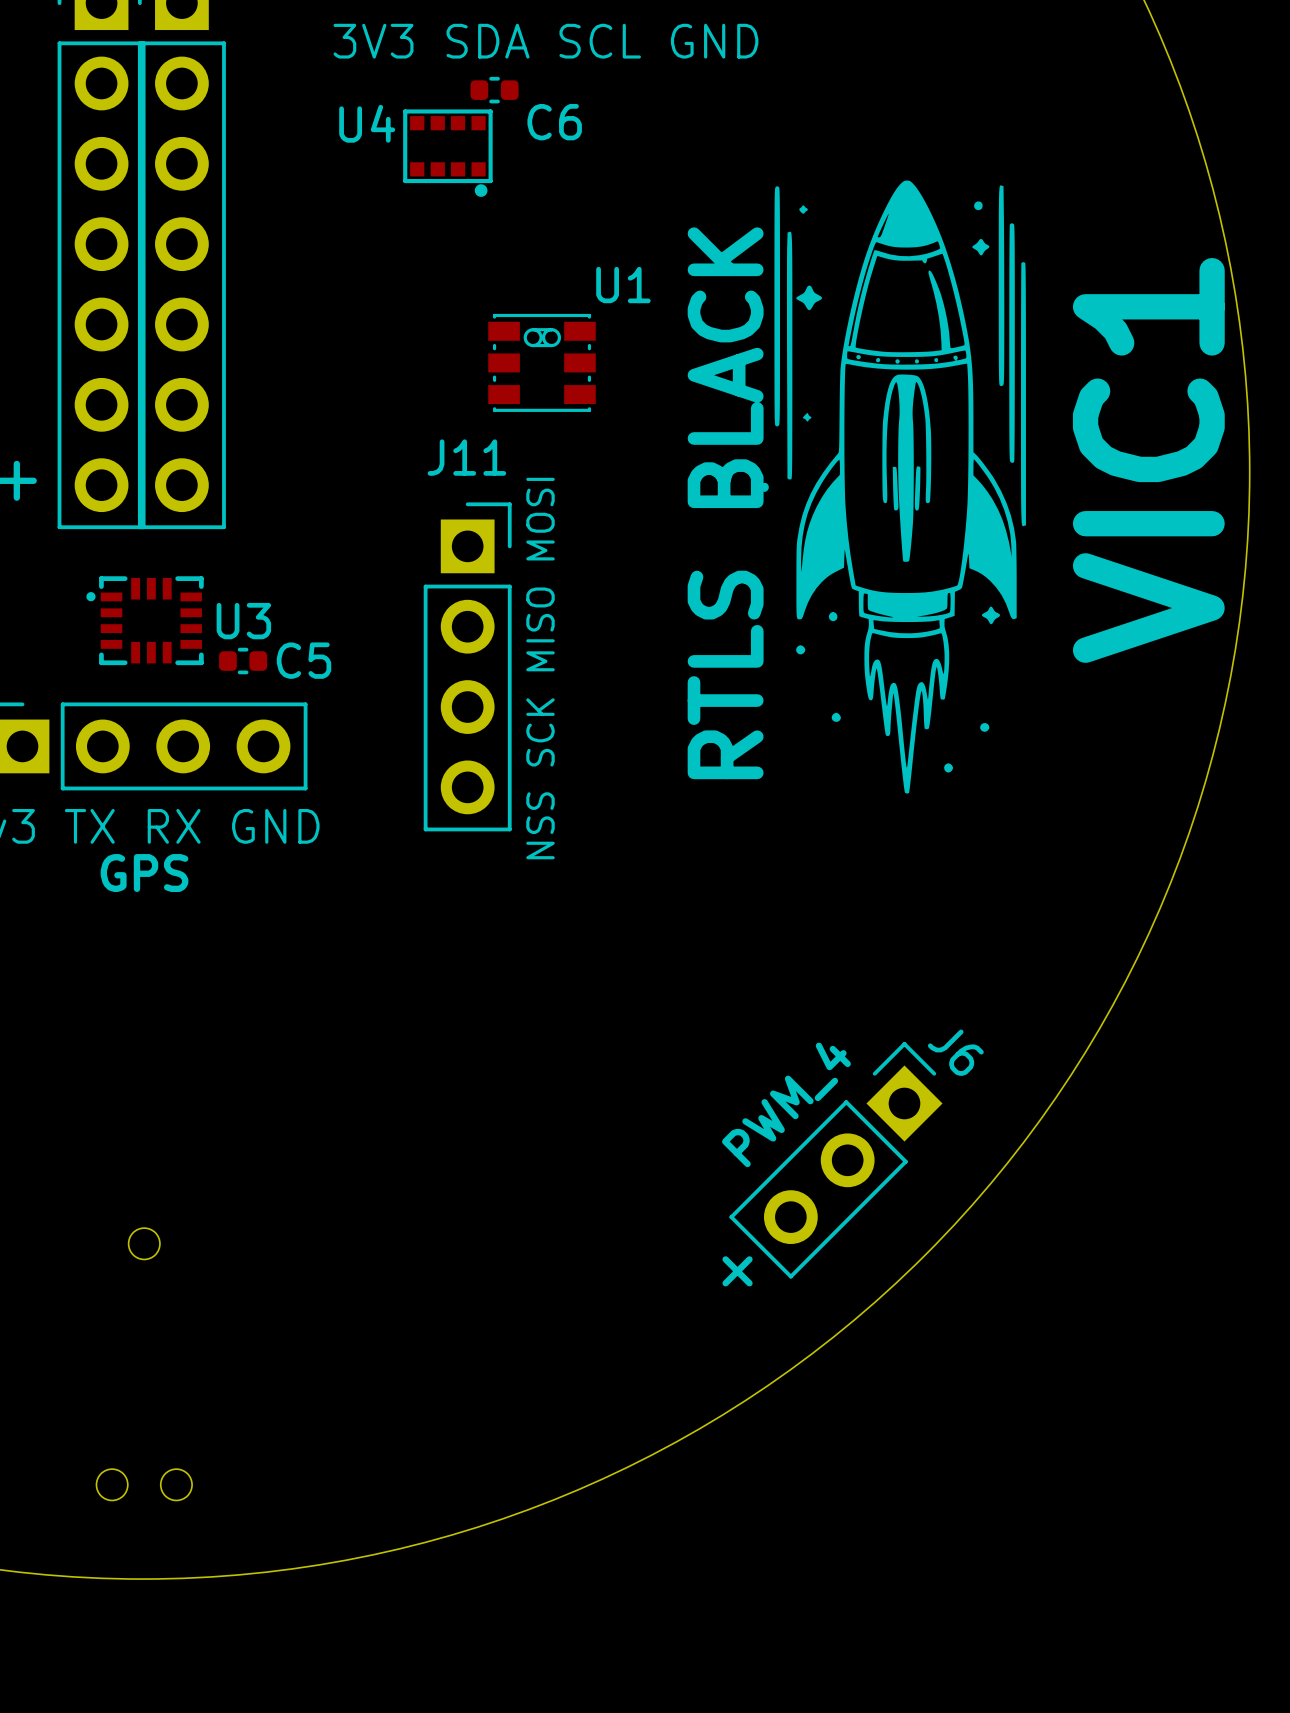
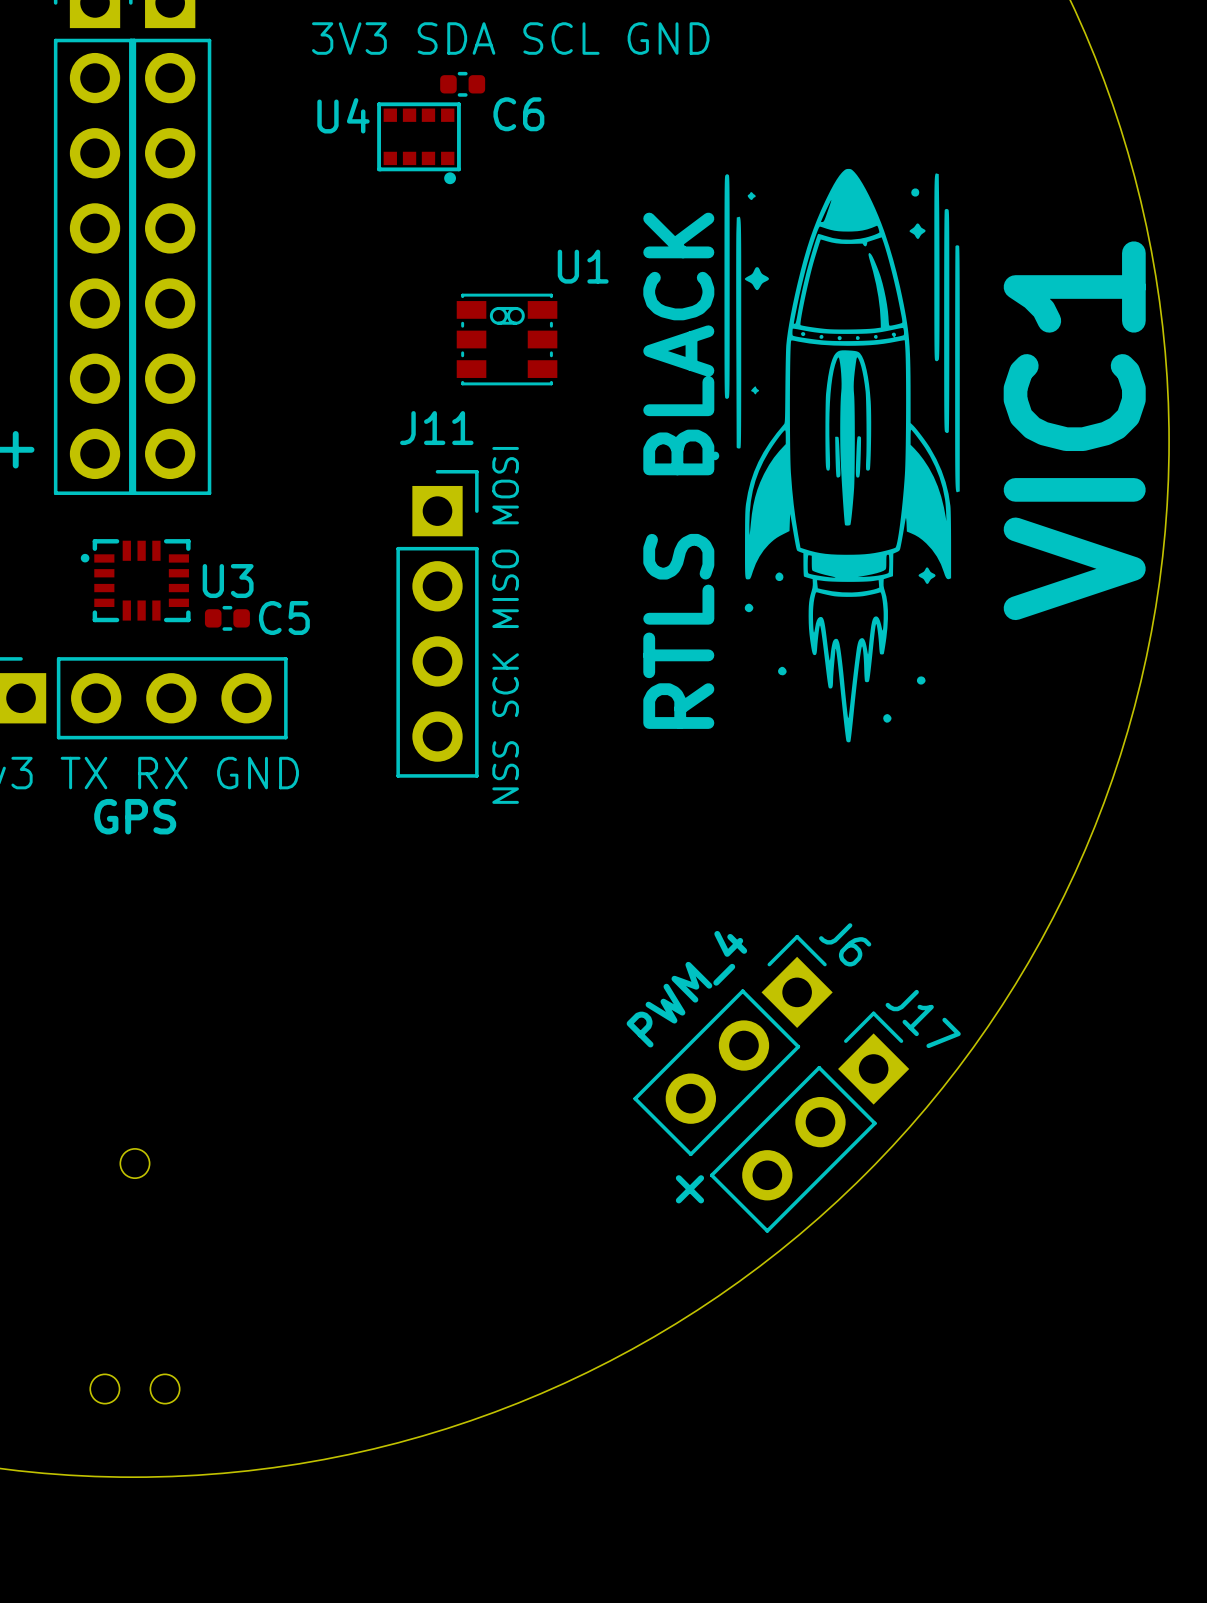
text position: PWM_4 (786, 1104) -> PWM_4 (686, 989)
J6 position: (836, 1160) -> (733, 1045)
J17: none -> (809, 1122)

